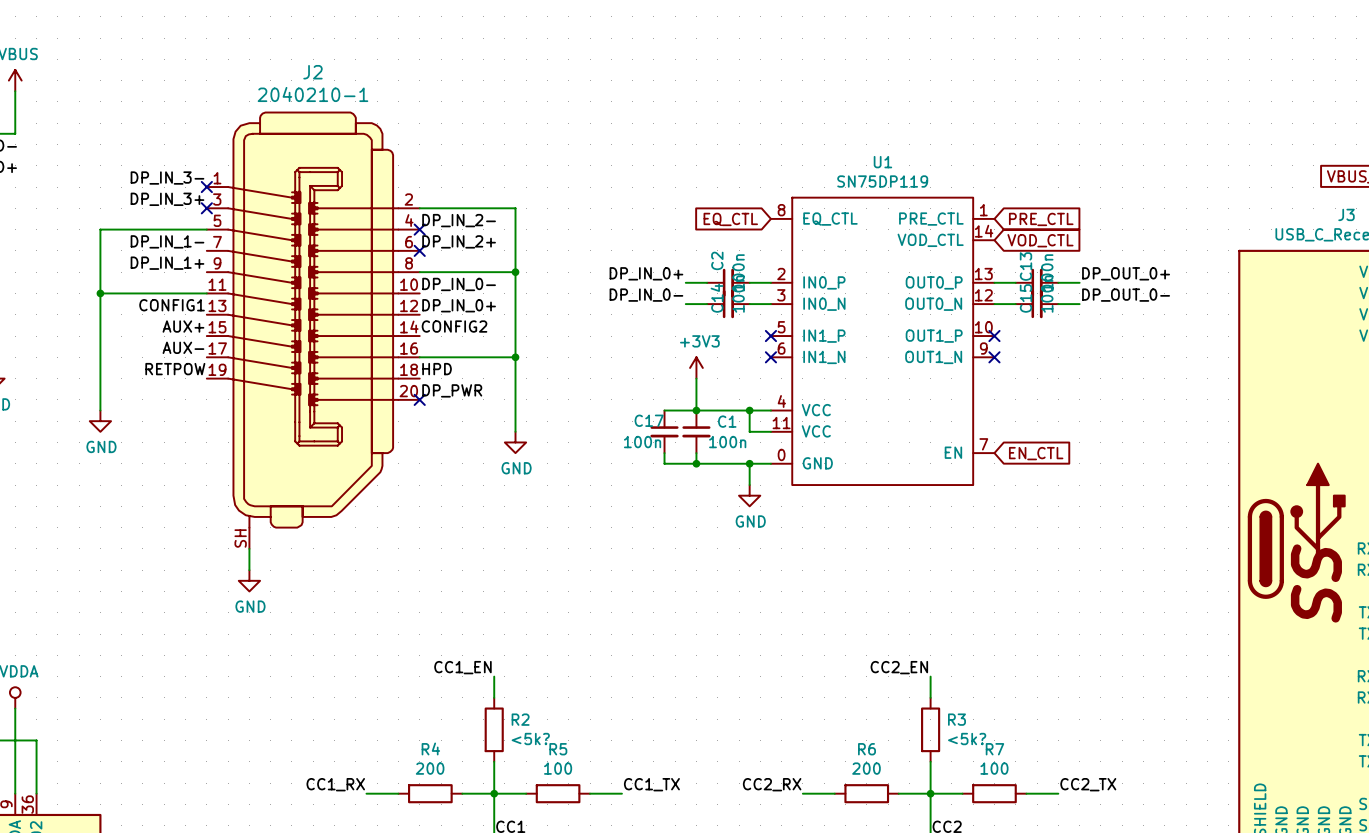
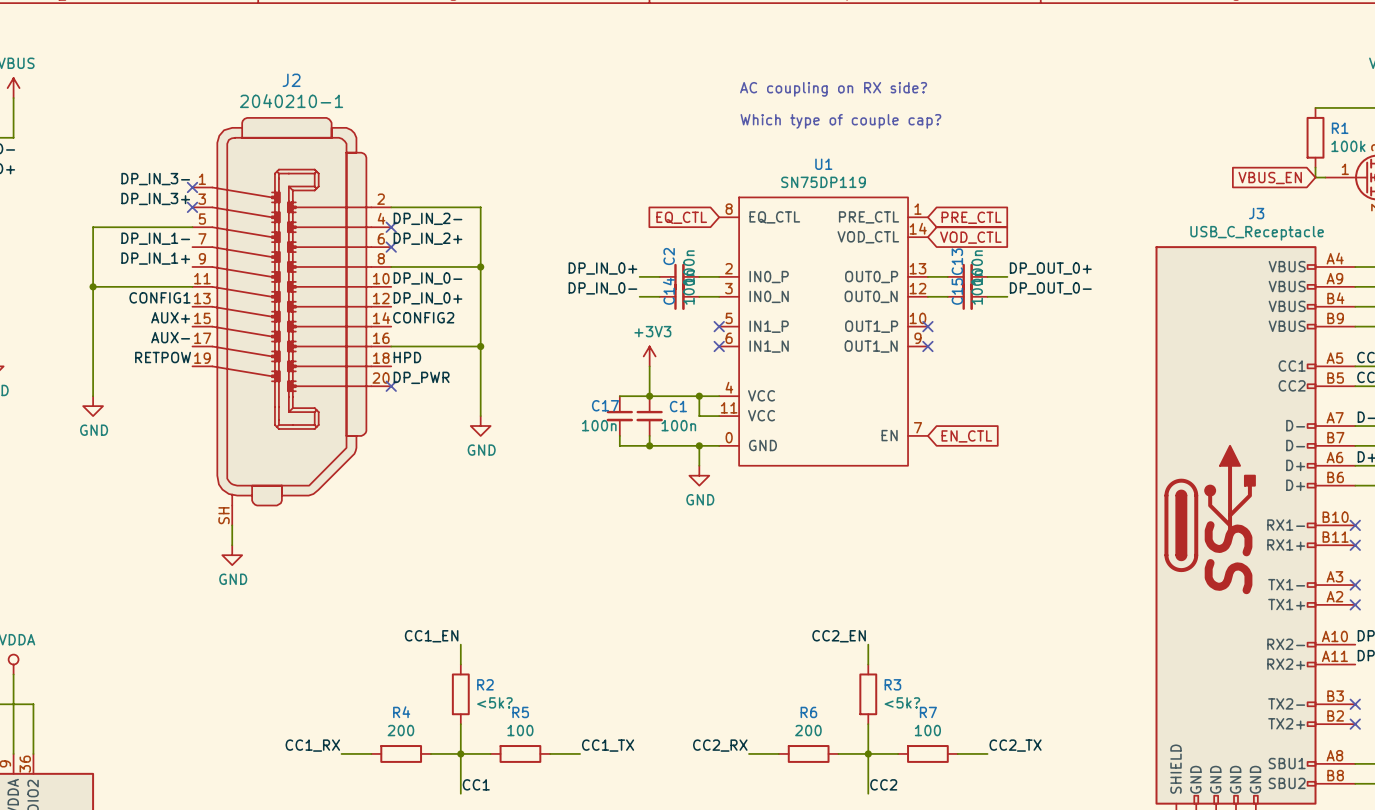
text: none -> AC coupling on RX side? (833, 89)
text: none -> Which type of couple cap? (840, 121)

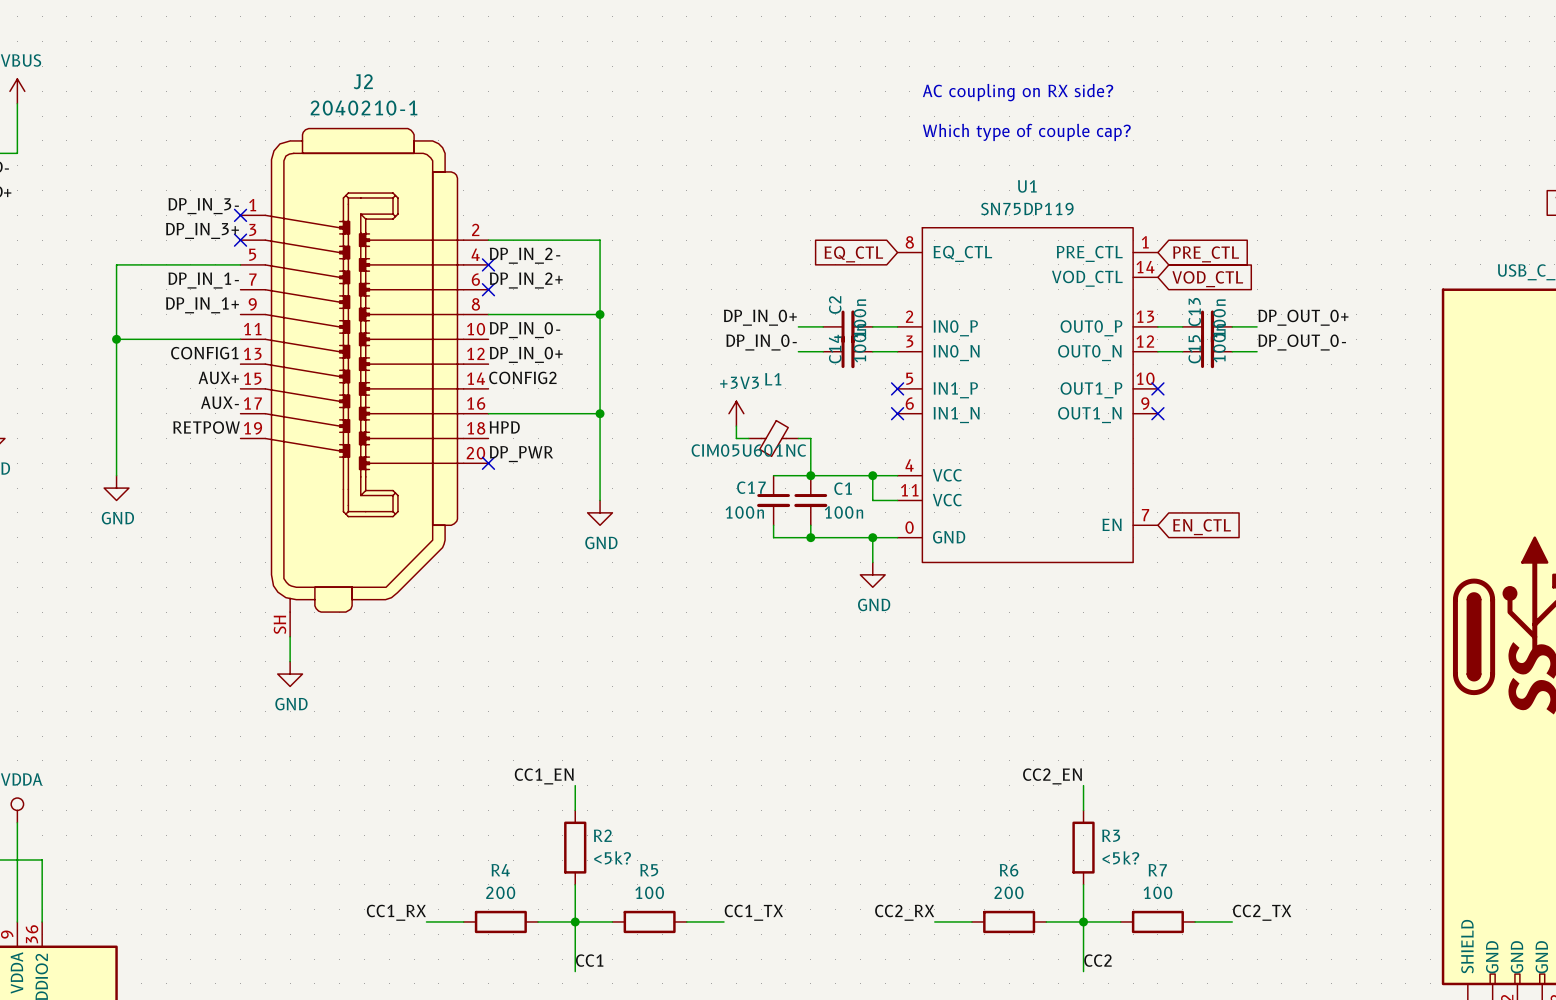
wire: none -> (736, 426) (736, 438) (748, 438)
power symbol position: +3V3 (649, 356) -> +3V3 (736, 413)
L1: none -> CIM05U601NC (773, 438)
wire: none -> (798, 438) (810, 438)

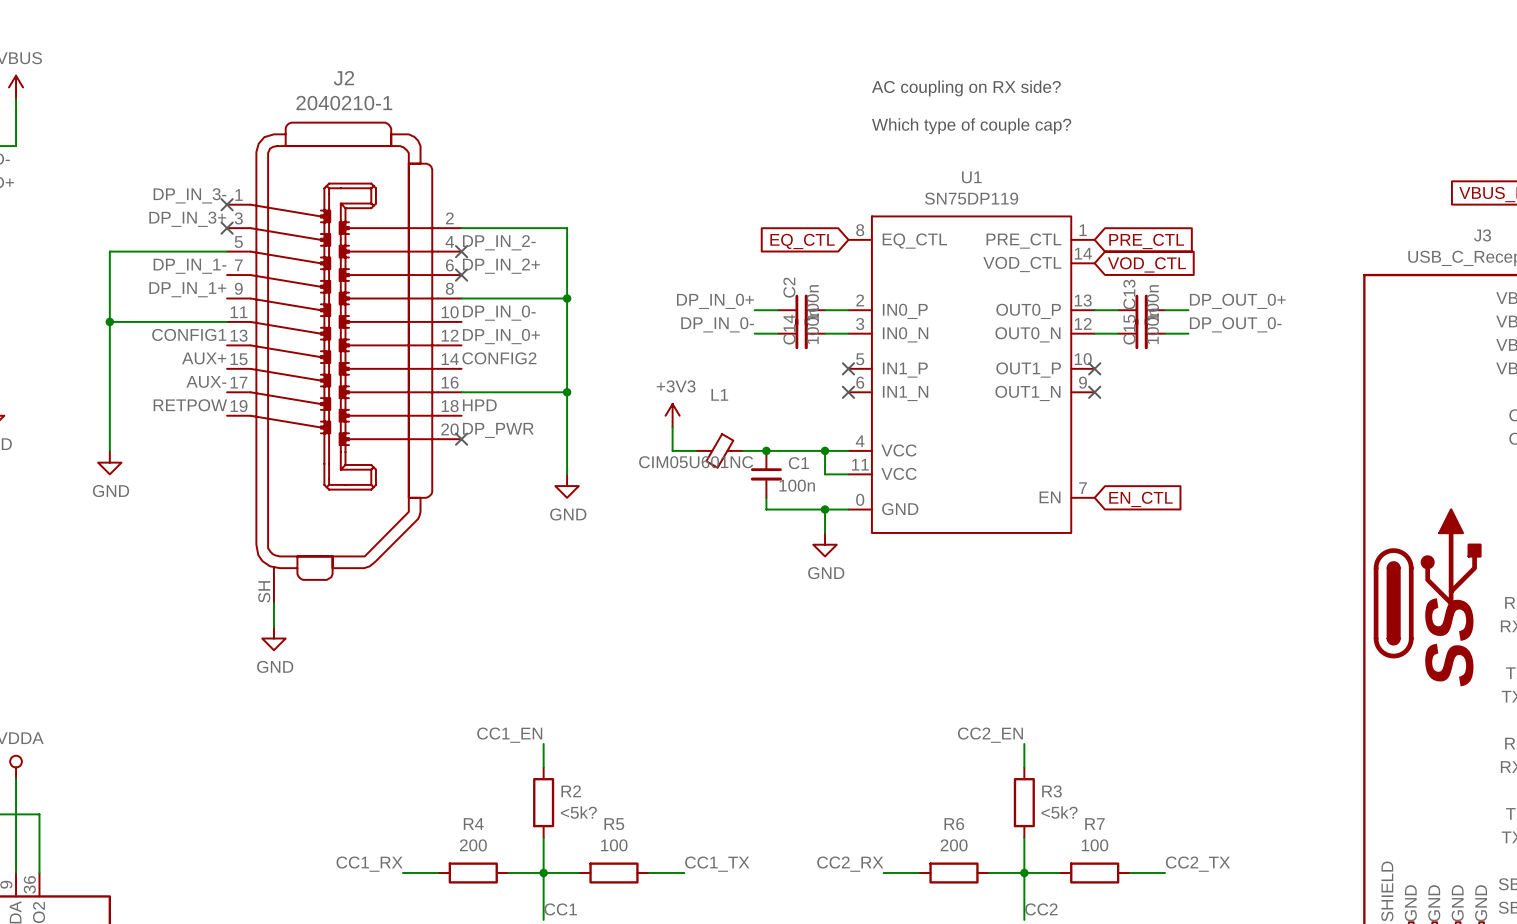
power symbol position: +3V3 (736, 413) -> +3V3 (672, 415)
wire: (736, 426) (736, 438) (748, 438) -> none
L1 position: (773, 438) -> (719, 450)
wire: (798, 438) (810, 438) (810, 475) -> none
wire: none -> (672, 427) (672, 450) (696, 450)
C17: 100n (773, 500) -> none
wire: (773, 525) (773, 537) (810, 537) -> none
junction: (810, 537) -> none

